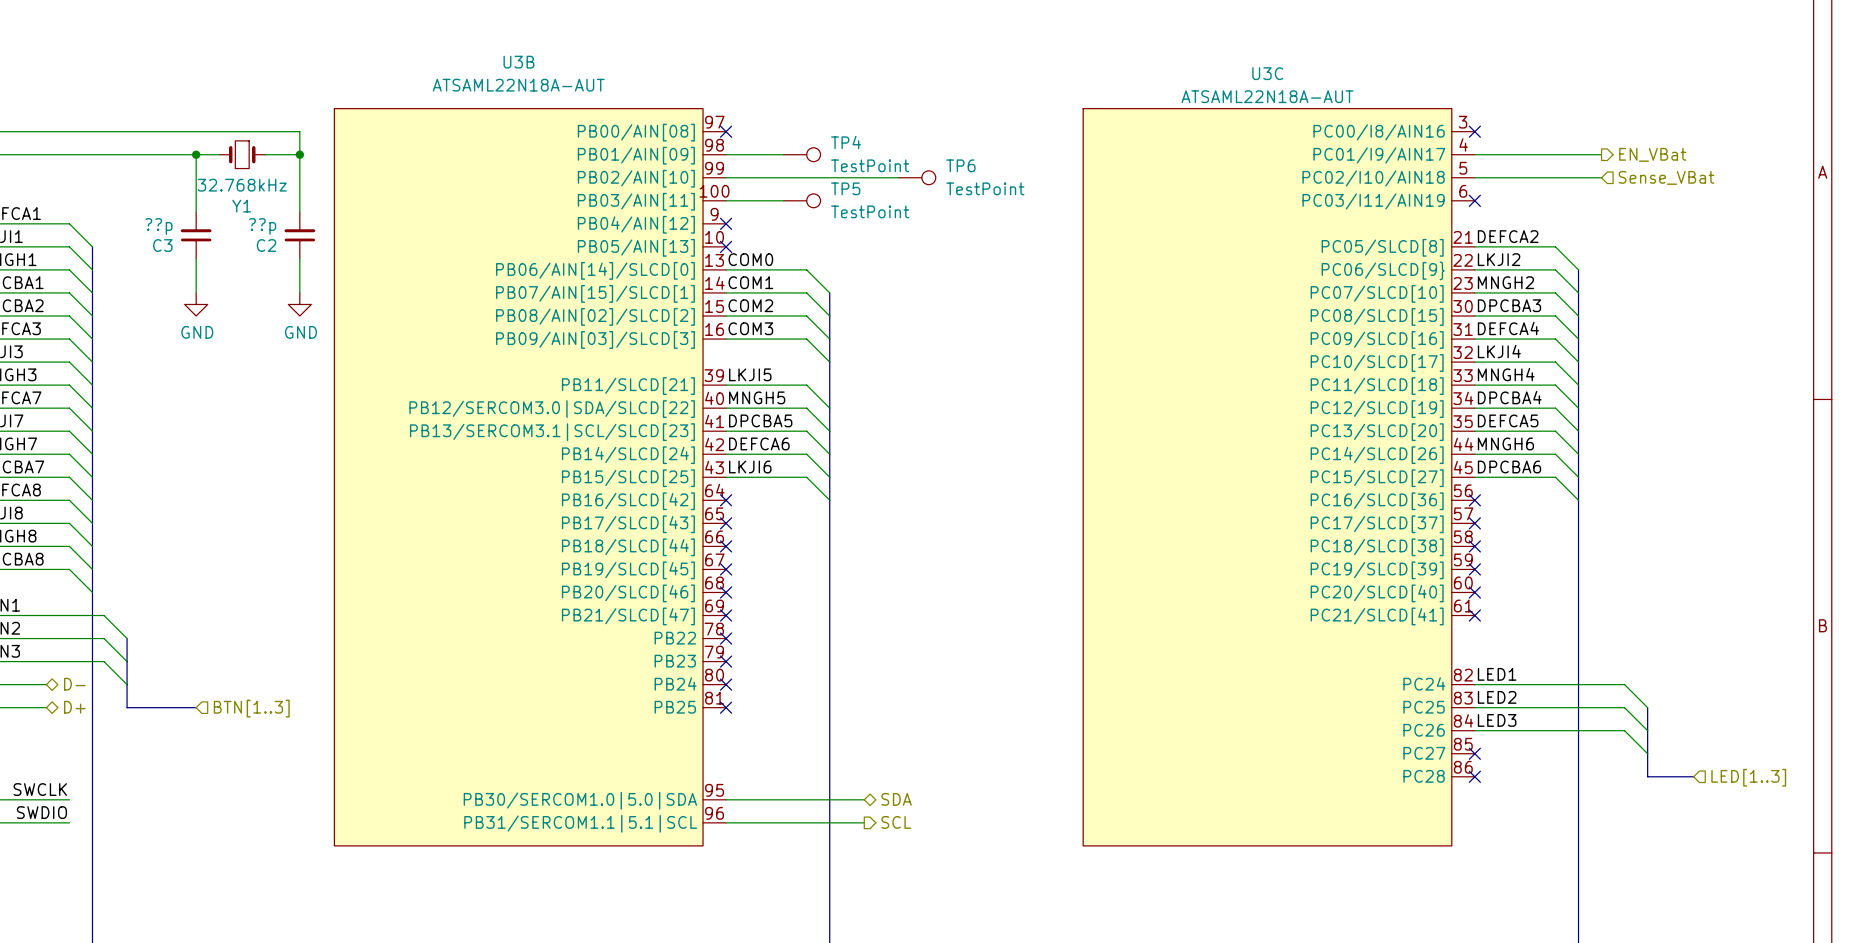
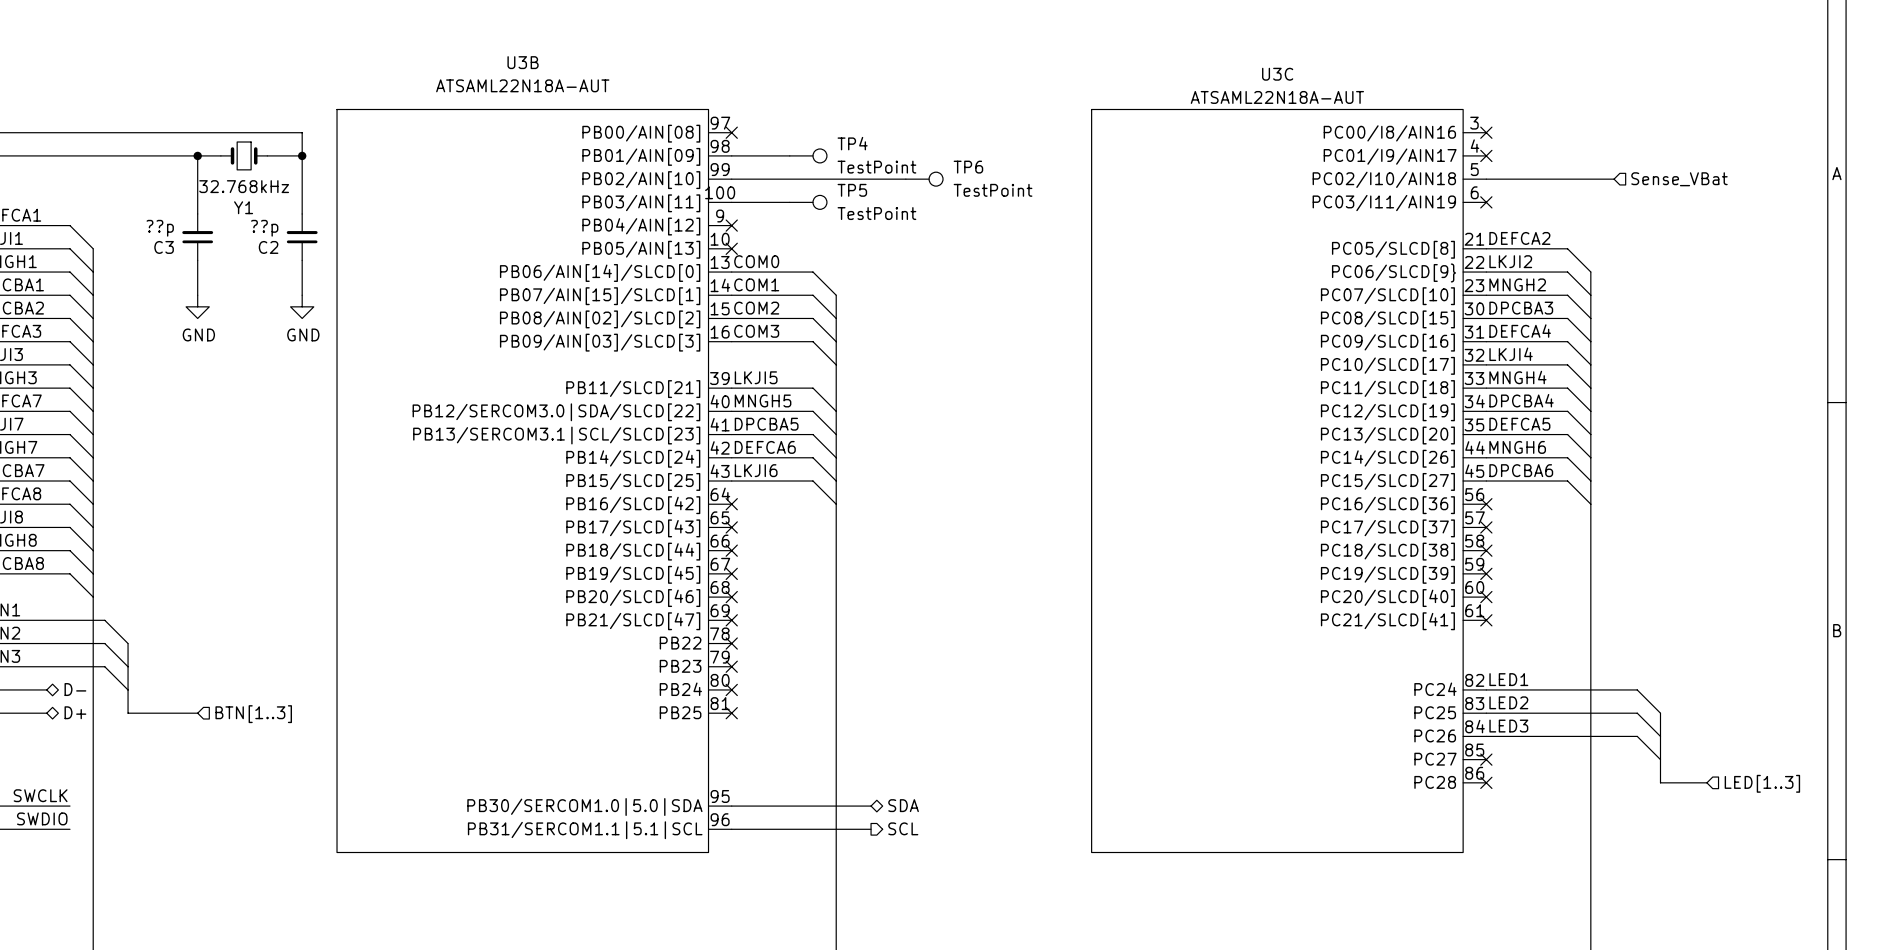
wire: (1474, 154) (1601, 154) -> none
no-connect mark: none -> (1486, 155)
hierarchical label: EN_VBat (1652, 154) -> none

